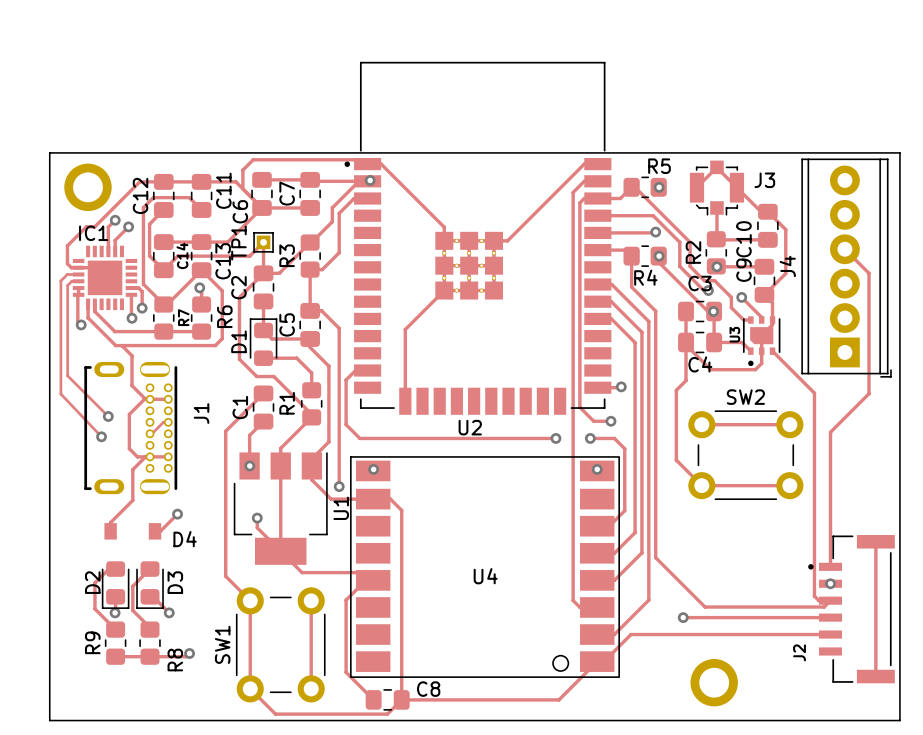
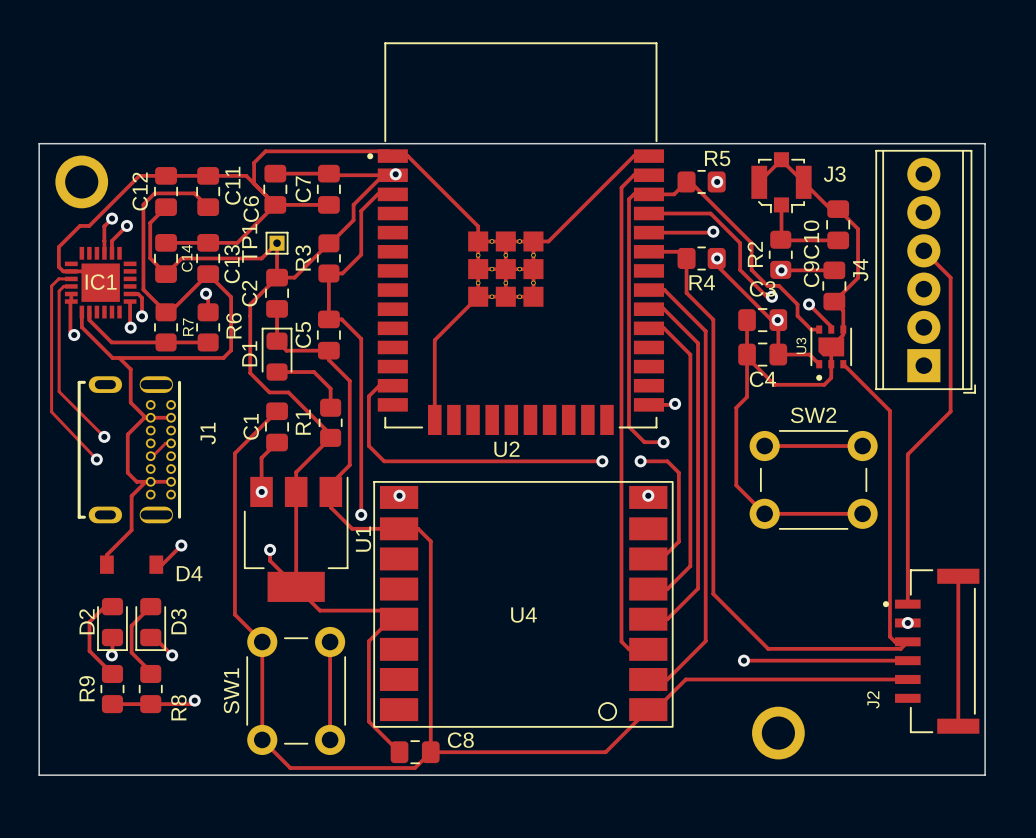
IC1 name position: IC1 (93, 233) -> IC1 (101, 282)

